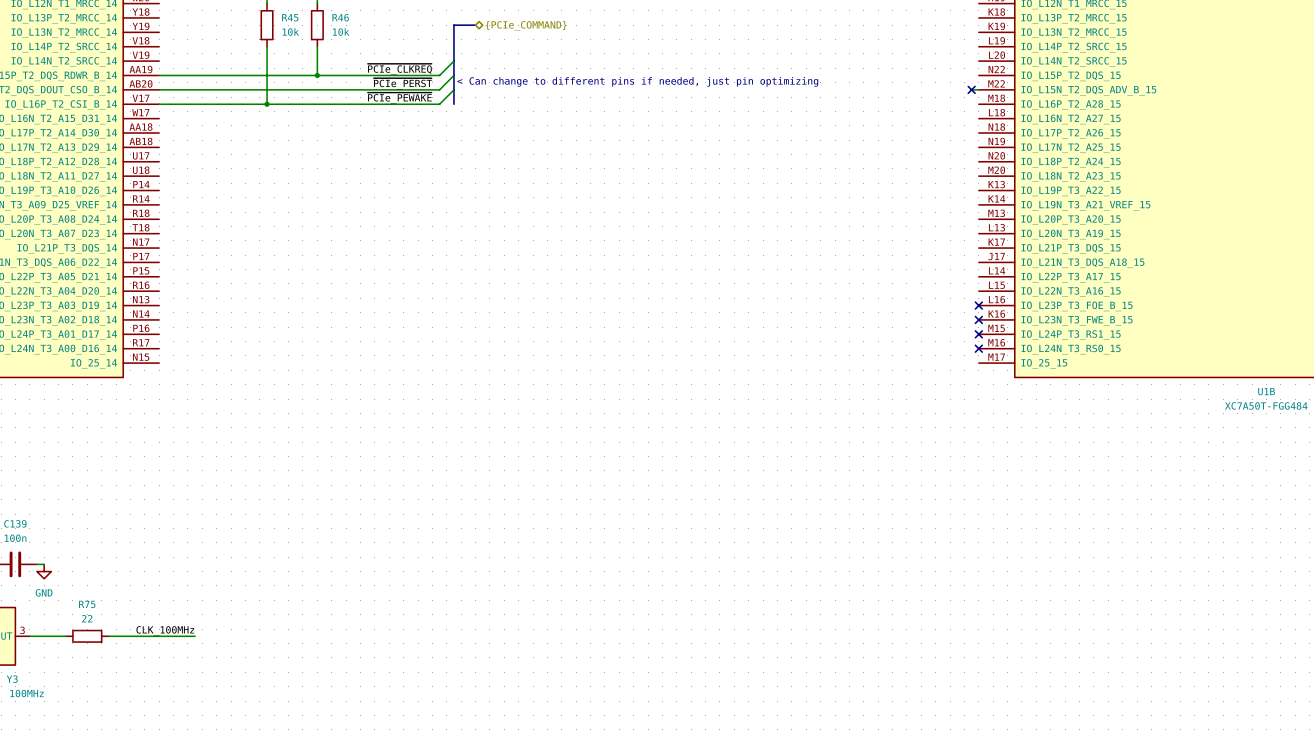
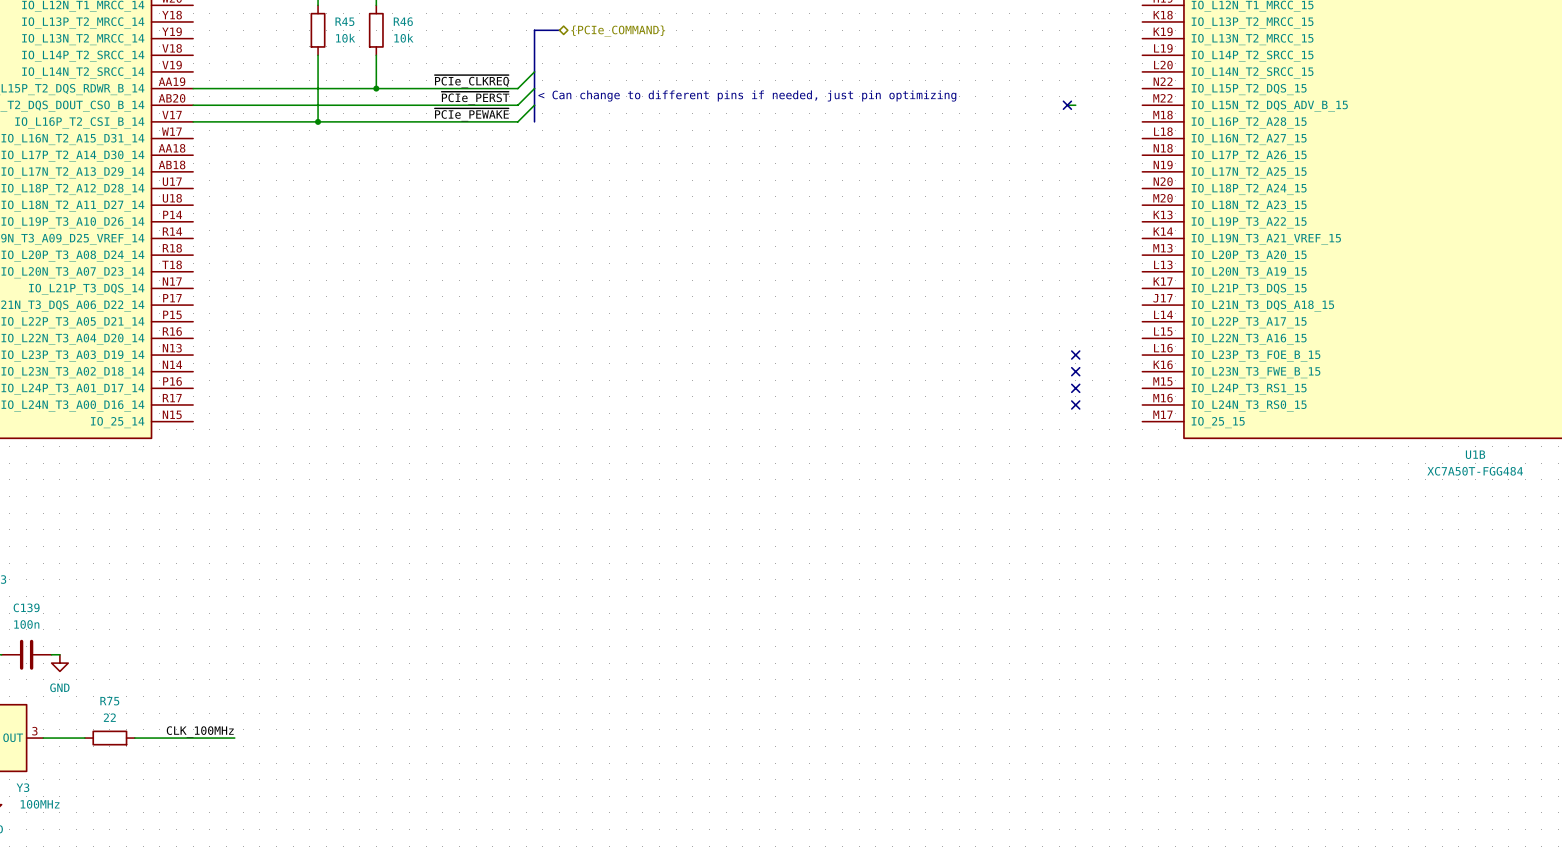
no-connect mark: none -> (1067, 105)
wire: (971, 89) (978, 89) -> (1067, 105) (1075, 105)
no-connect mark: (971, 89) -> none
no-connect mark: none -> (1075, 355)
no-connect mark: (978, 305) -> none
no-connect mark: none -> (1075, 371)
no-connect mark: (978, 319) -> none
no-connect mark: none -> (1075, 388)
no-connect mark: (978, 334) -> none
no-connect mark: none -> (1075, 404)
no-connect mark: (978, 348) -> none

